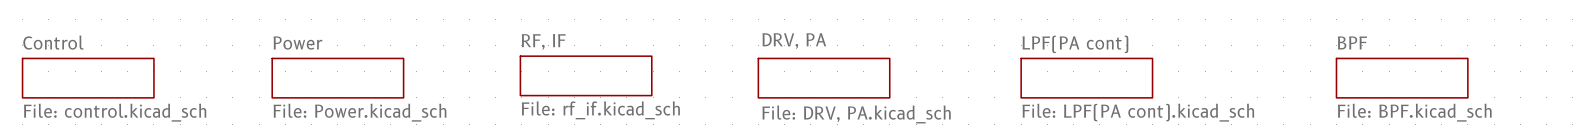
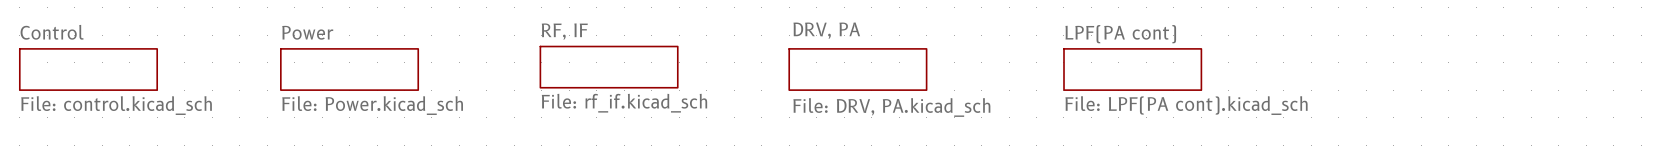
sheet BPF: File: BPF.kicad_sch (1402, 78) -> none

